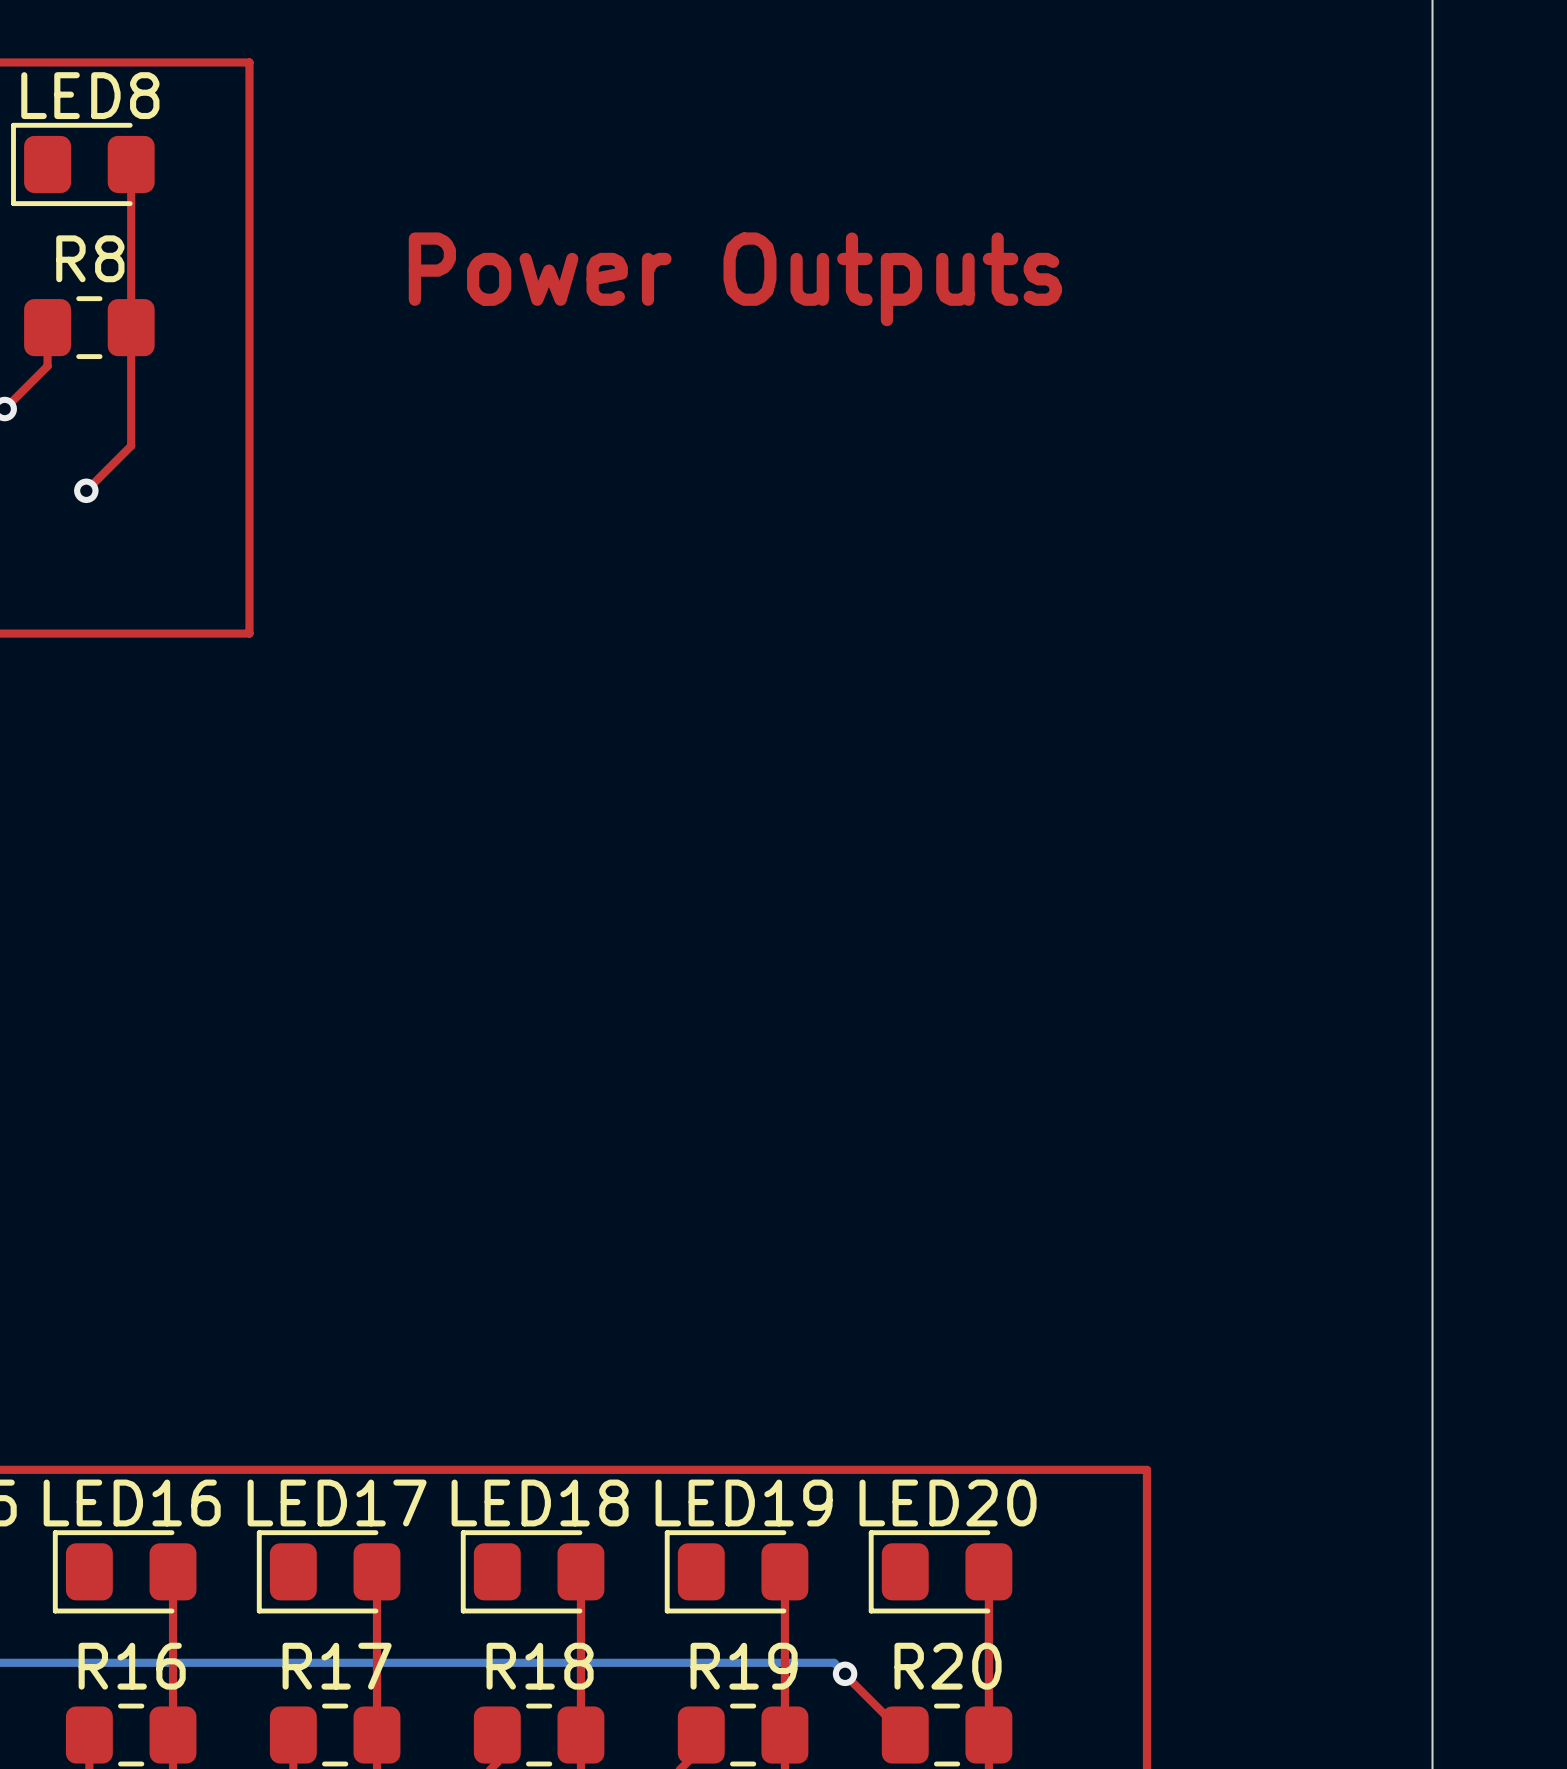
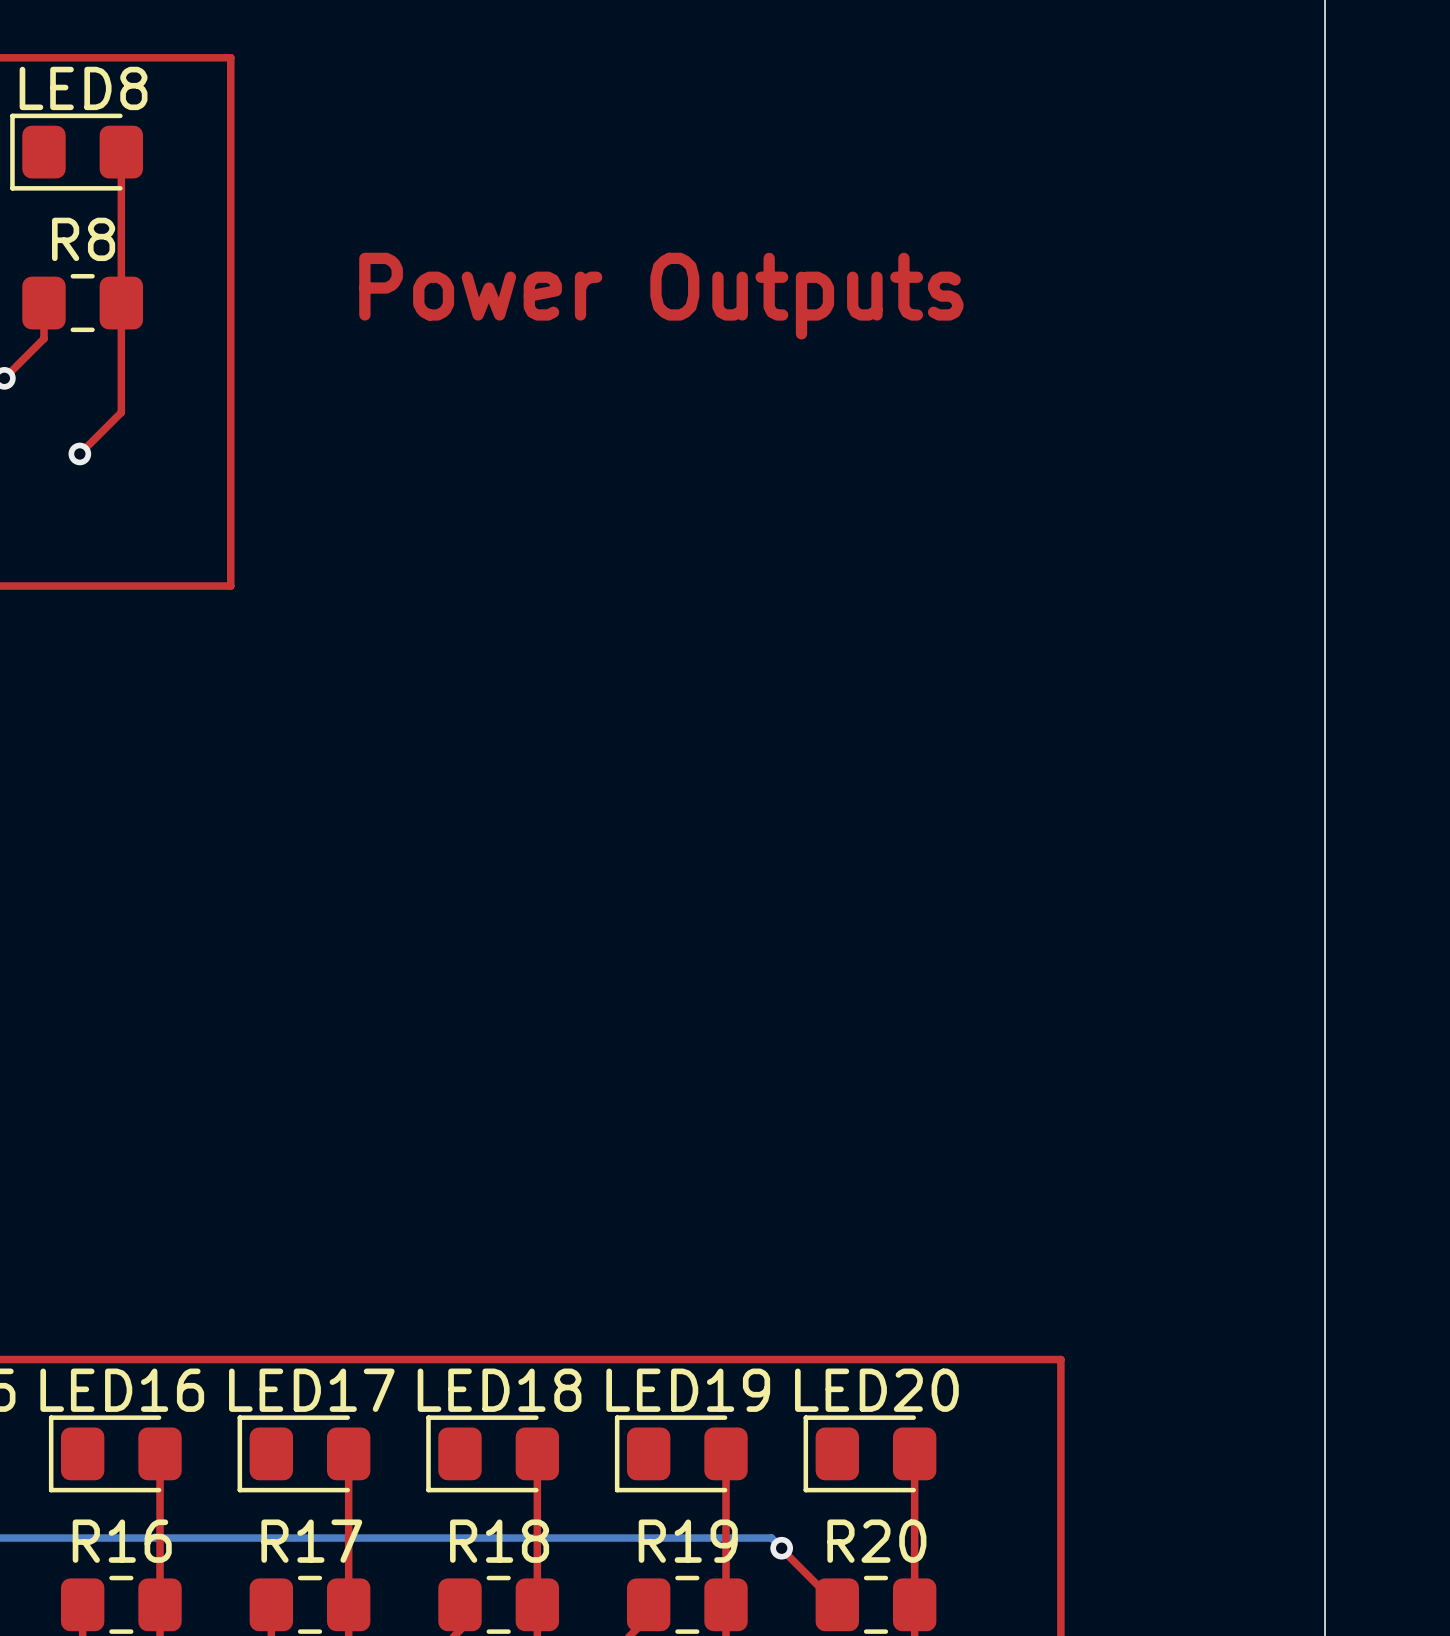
text position: Power Outputs (735, 279) -> Power Outputs (661, 296)

